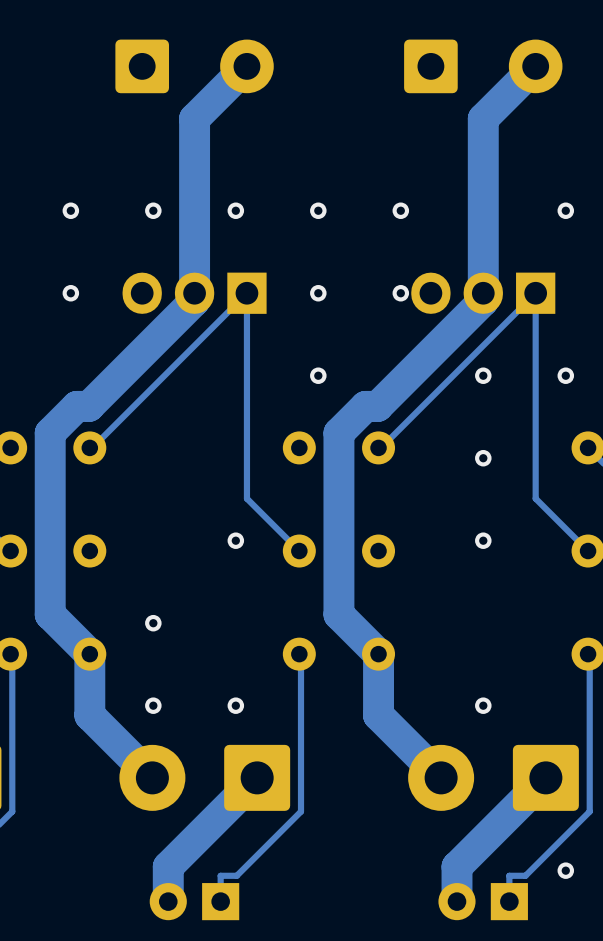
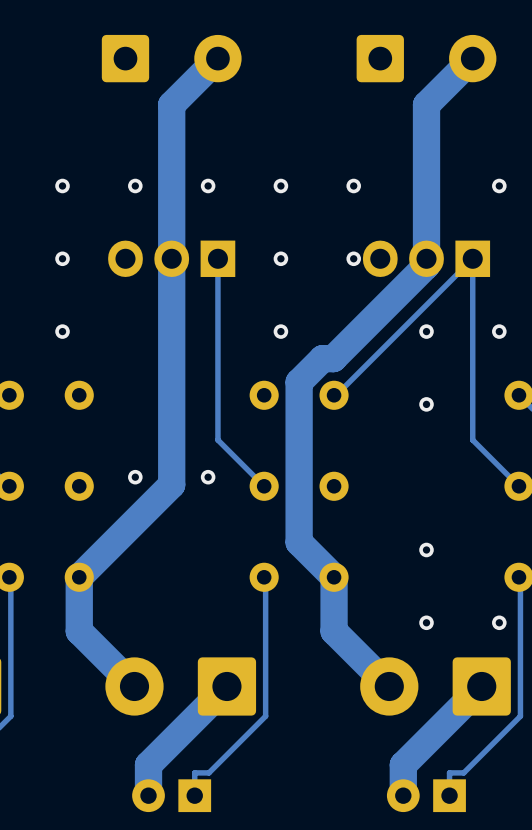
track: (246, 293) (92, 447) (89, 447) -> none
track: (194, 300) (89, 406) (76, 406) (50, 433) (50, 614) (89, 654) -> (171, 265) (171, 484) (79, 577)
via: none -> (62, 331)
via: none -> (135, 477)
via position: (483, 540) -> (426, 549)
via: (153, 623) -> none
via: (153, 705) -> none
via: (235, 705) -> none
via: none -> (499, 622)
via: (565, 870) -> none

